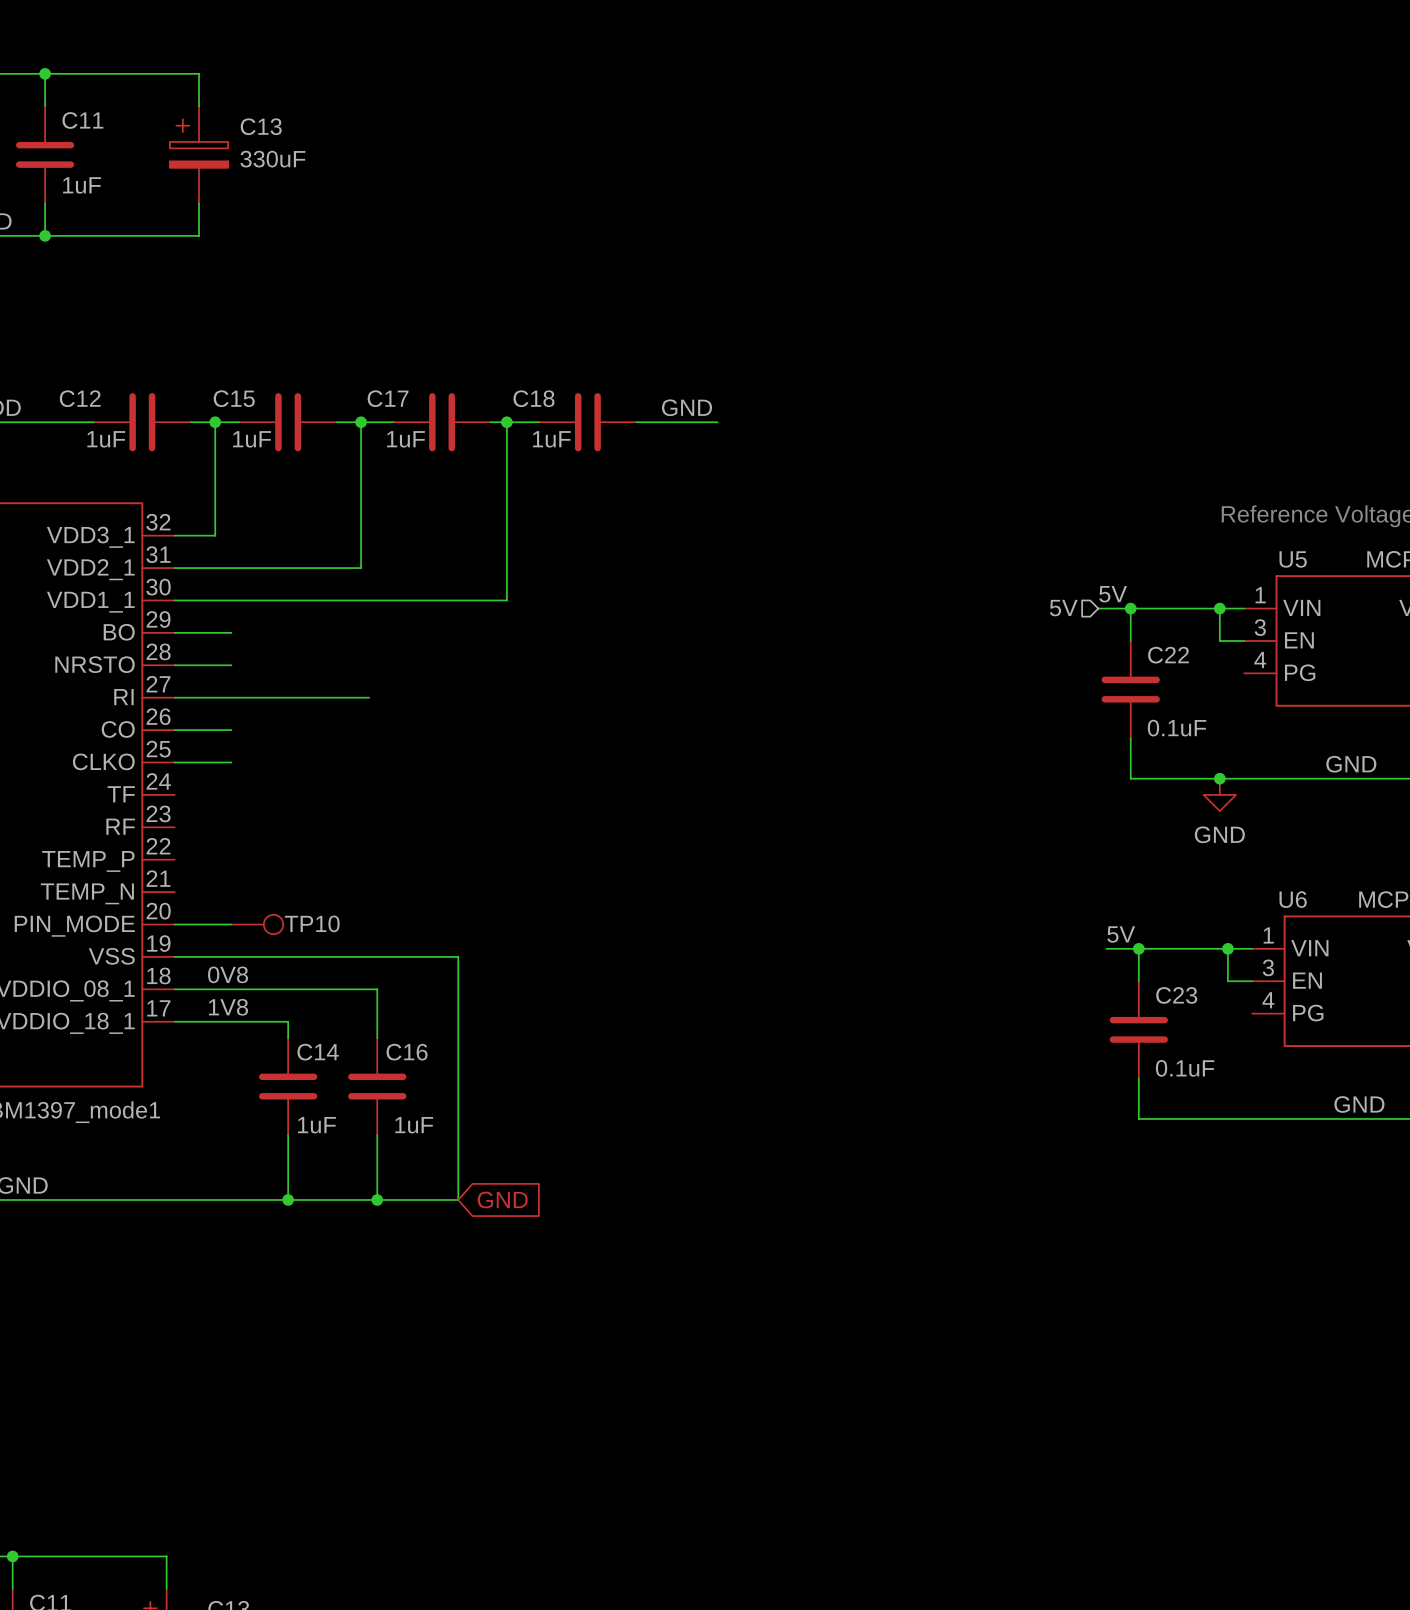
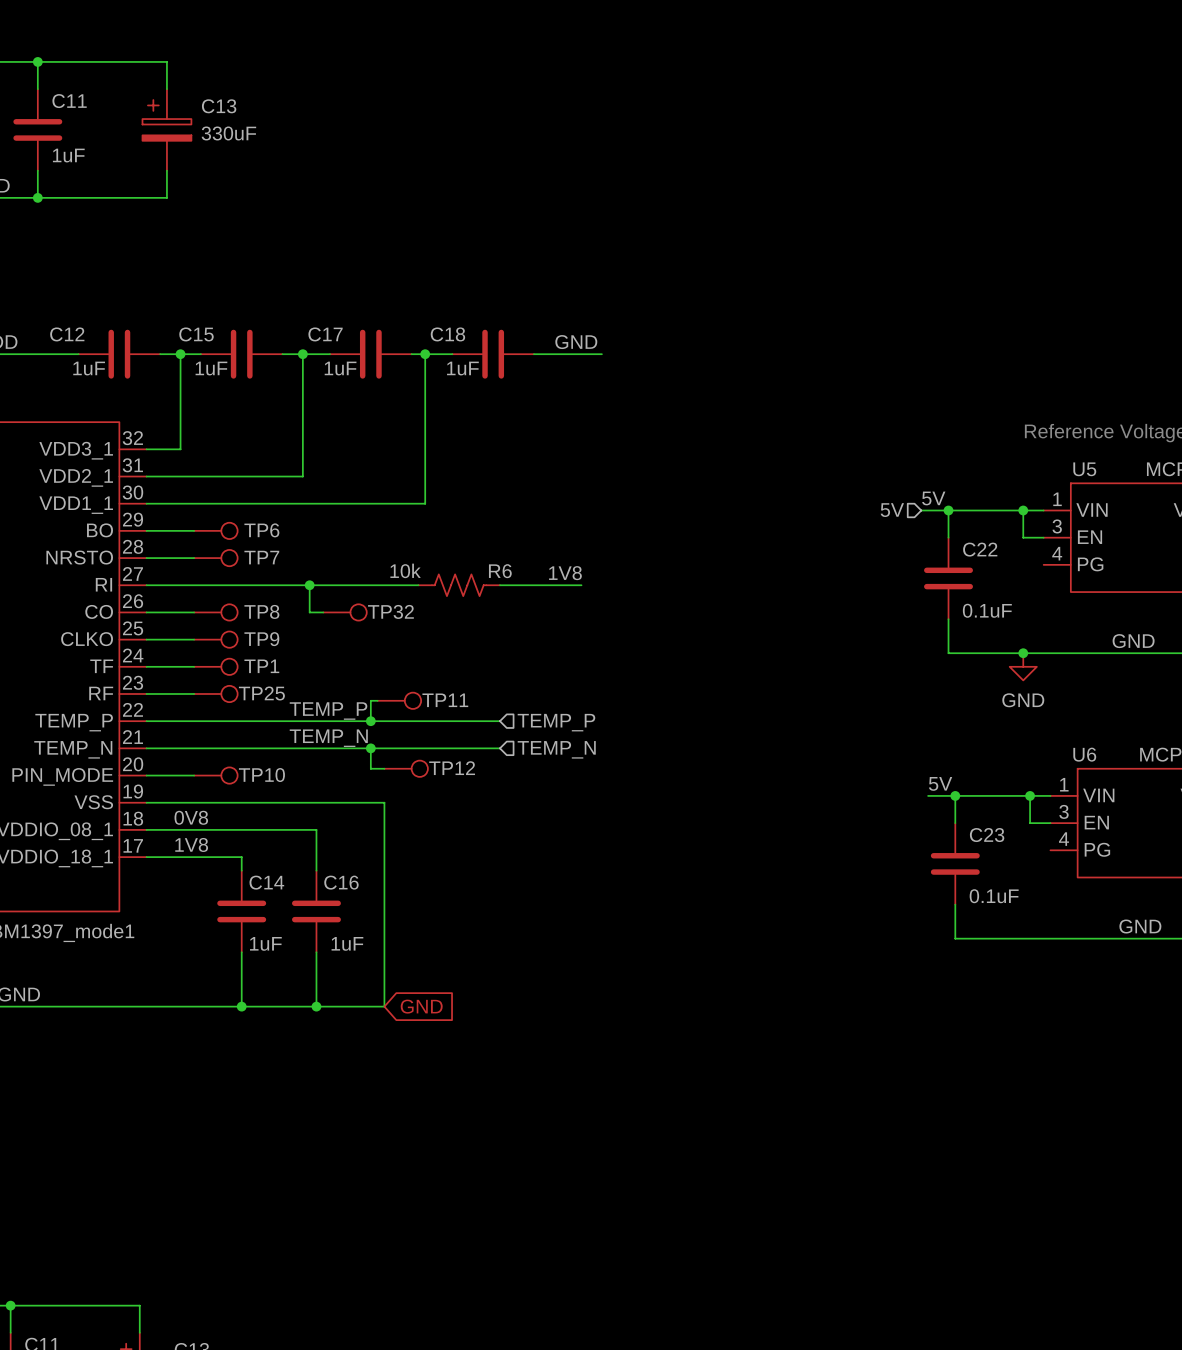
TP6: none -> (215, 530)
TP7: none -> (215, 558)
label: none -> 1V8 (565, 573)
junction: none -> (309, 585)
wire: none -> (418, 585) (309, 585) (309, 612) (323, 612)
R6: none -> 10k (459, 585)
wire: none -> (499, 585) (581, 585)
TP8: none -> (215, 612)
TP32: none -> (345, 612)
TP9: none -> (215, 639)
wire: none -> (146, 666) (194, 666)
TP1: none -> (215, 666)
wire: none -> (146, 694) (194, 694)
TP25: none -> (215, 694)
wire: none -> (377, 700) (370, 700) (370, 721)
TP11: none -> (399, 700)
label: none -> TEMP_P (328, 711)
wire: none -> (146, 721) (499, 721)
junction: none -> (370, 721)
hierarchical label: none -> TEMP_P (556, 722)
label: none -> TEMP_N (328, 738)
wire: none -> (146, 748) (499, 748)
wire: none -> (370, 748) (370, 768) (384, 768)
junction: none -> (370, 748)
hierarchical label: none -> TEMP_N (556, 749)
TP12: none -> (406, 768)

